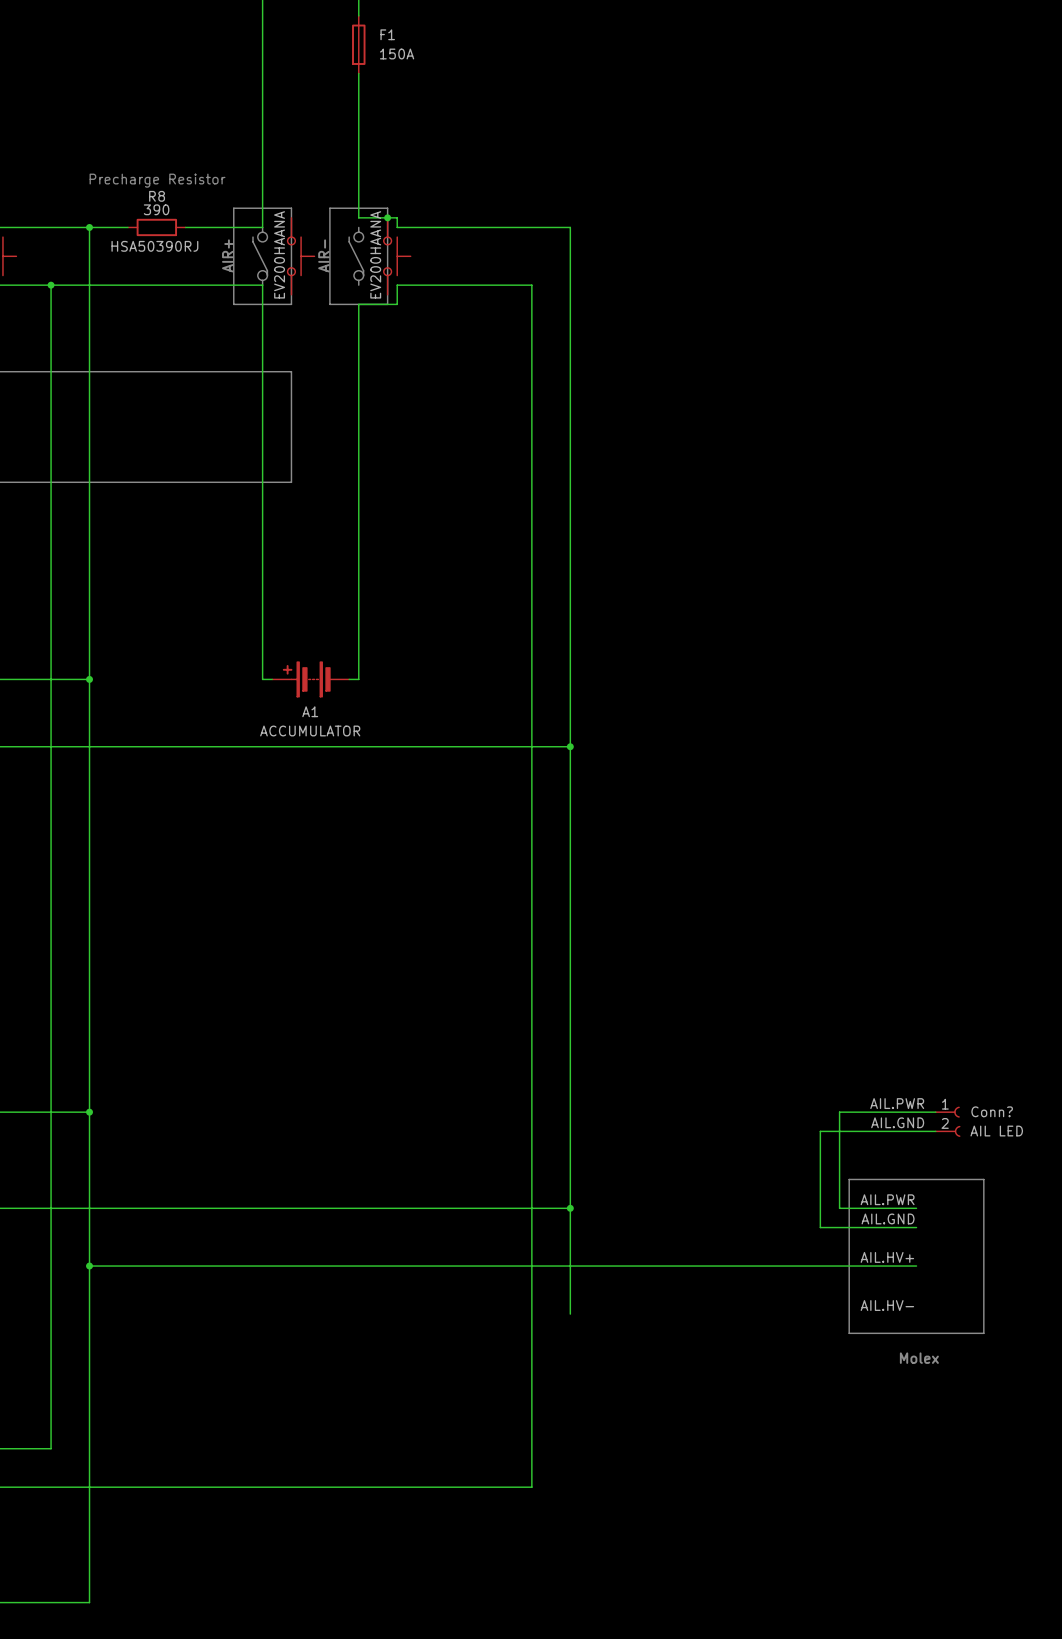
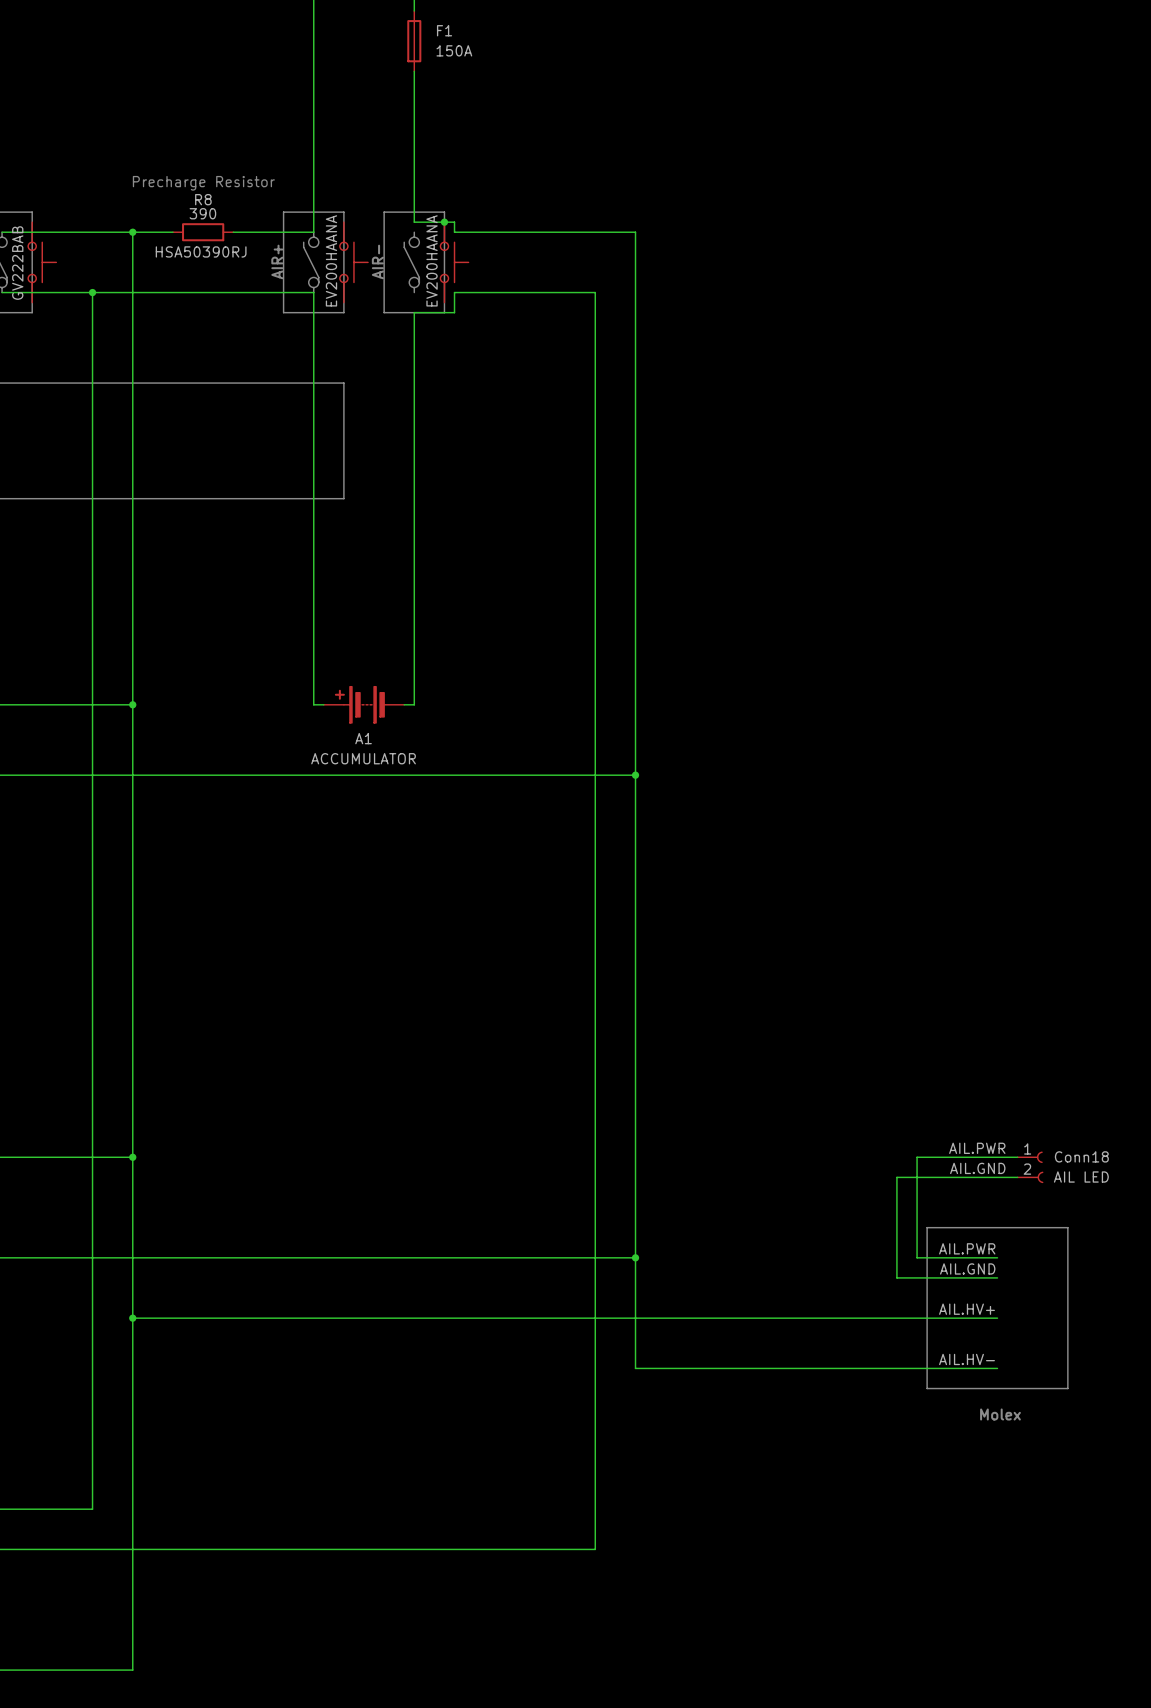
Conn? name: Conn? (992, 1111) -> Conn18 (1081, 1156)
wire: none -> (635, 1368) (997, 1368)

